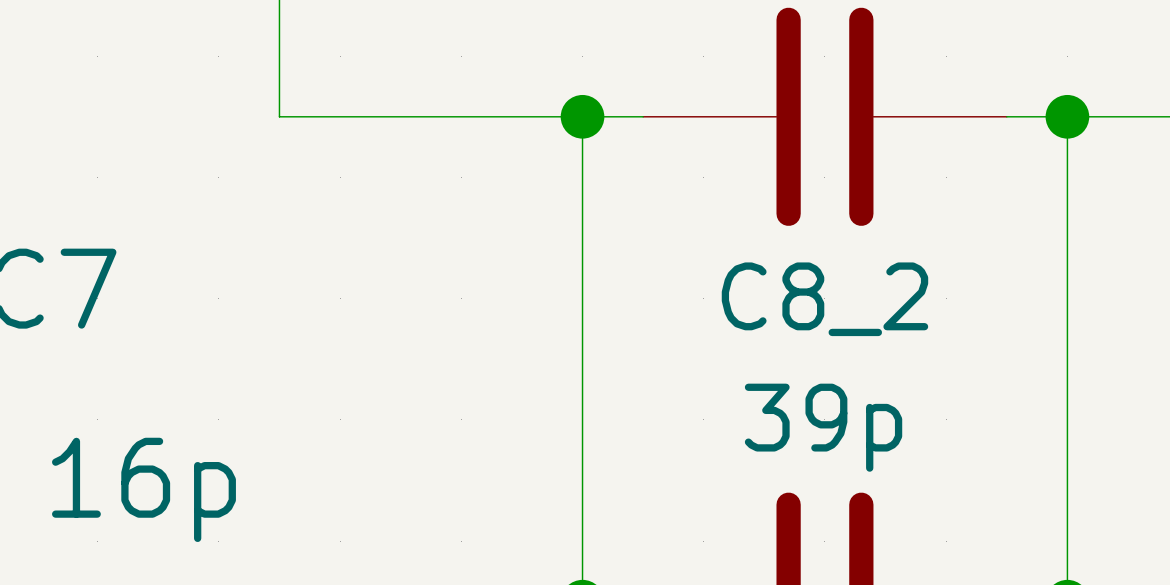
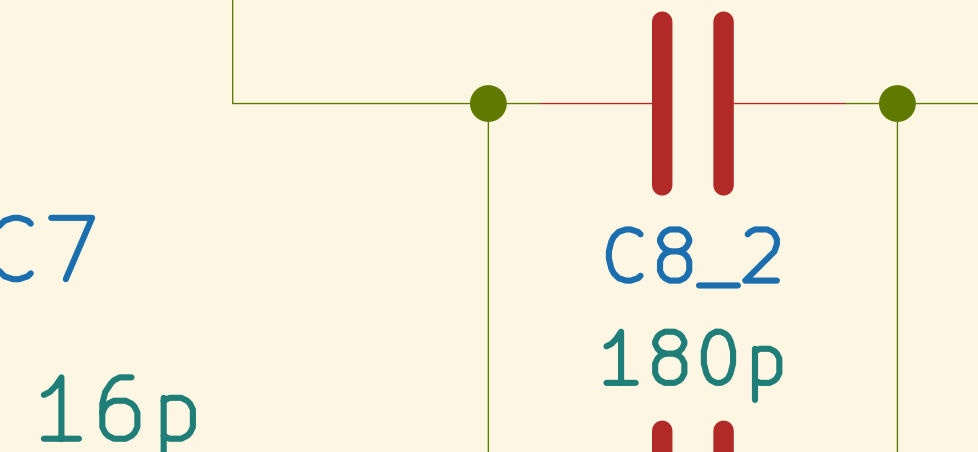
C8_2 value: 39p (823, 427) -> 180p (692, 365)

